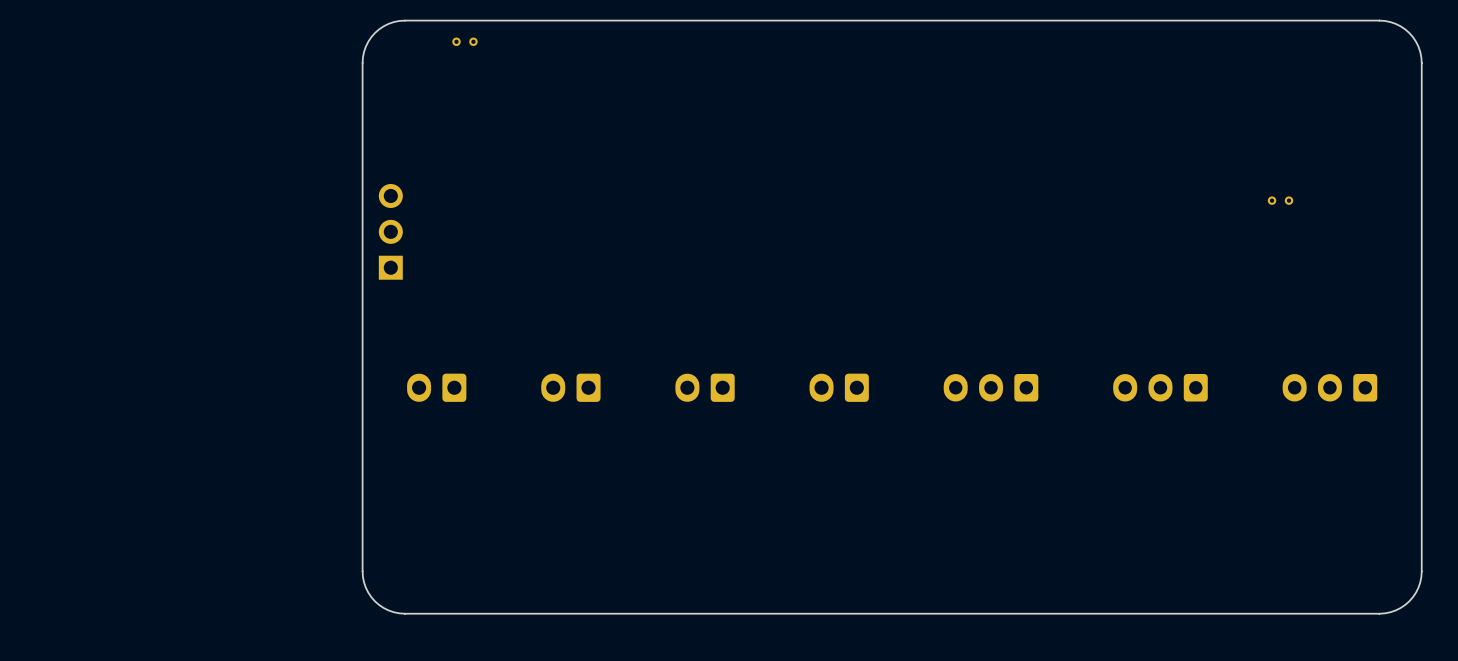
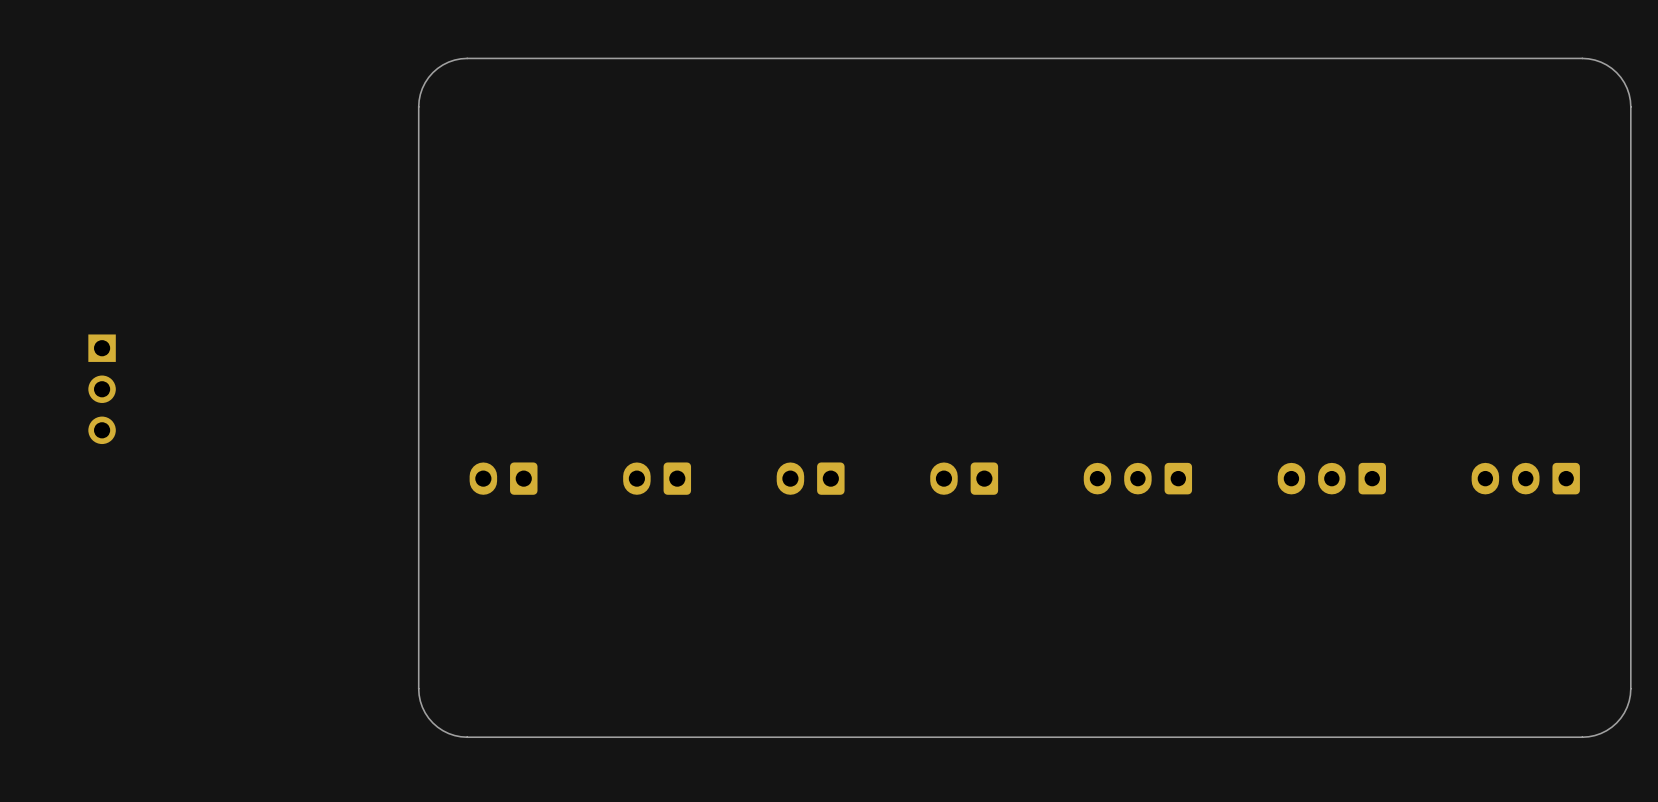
part: (464, 41) -> none
part: (1280, 200) -> none
part rotation: 0° (390, 231) -> 180° (102, 389)
part position: (390, 231) -> (102, 389)

